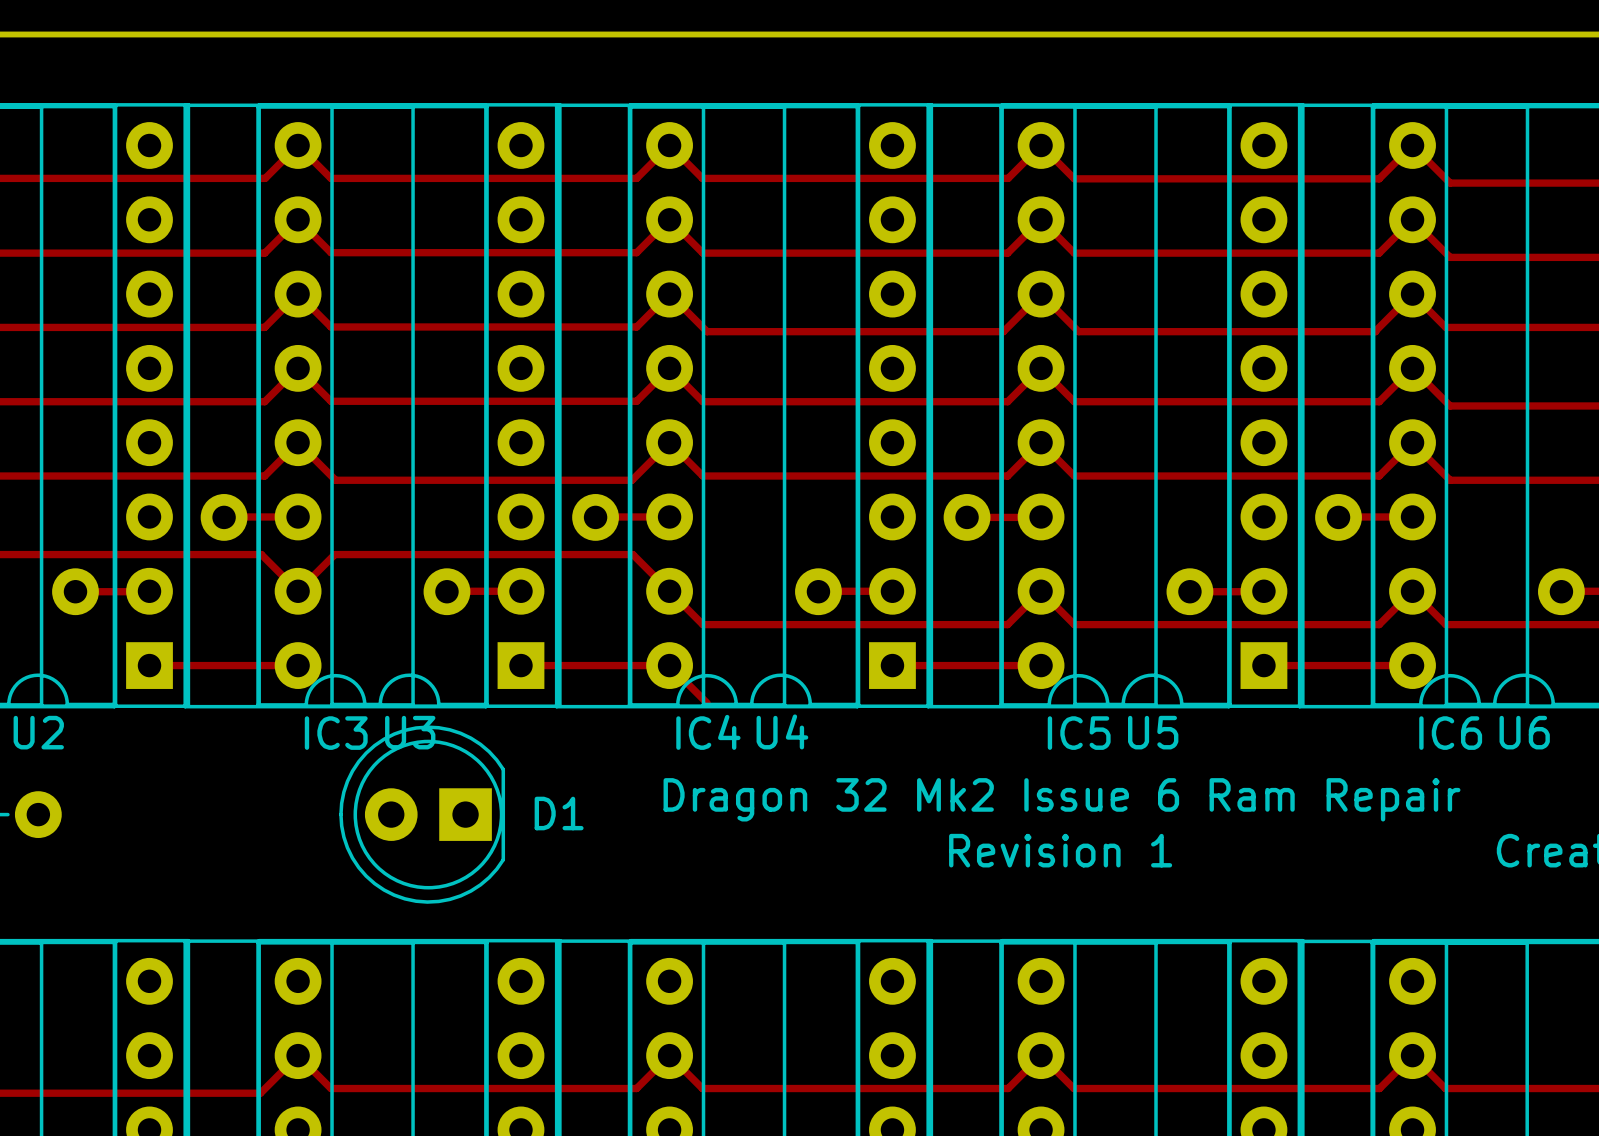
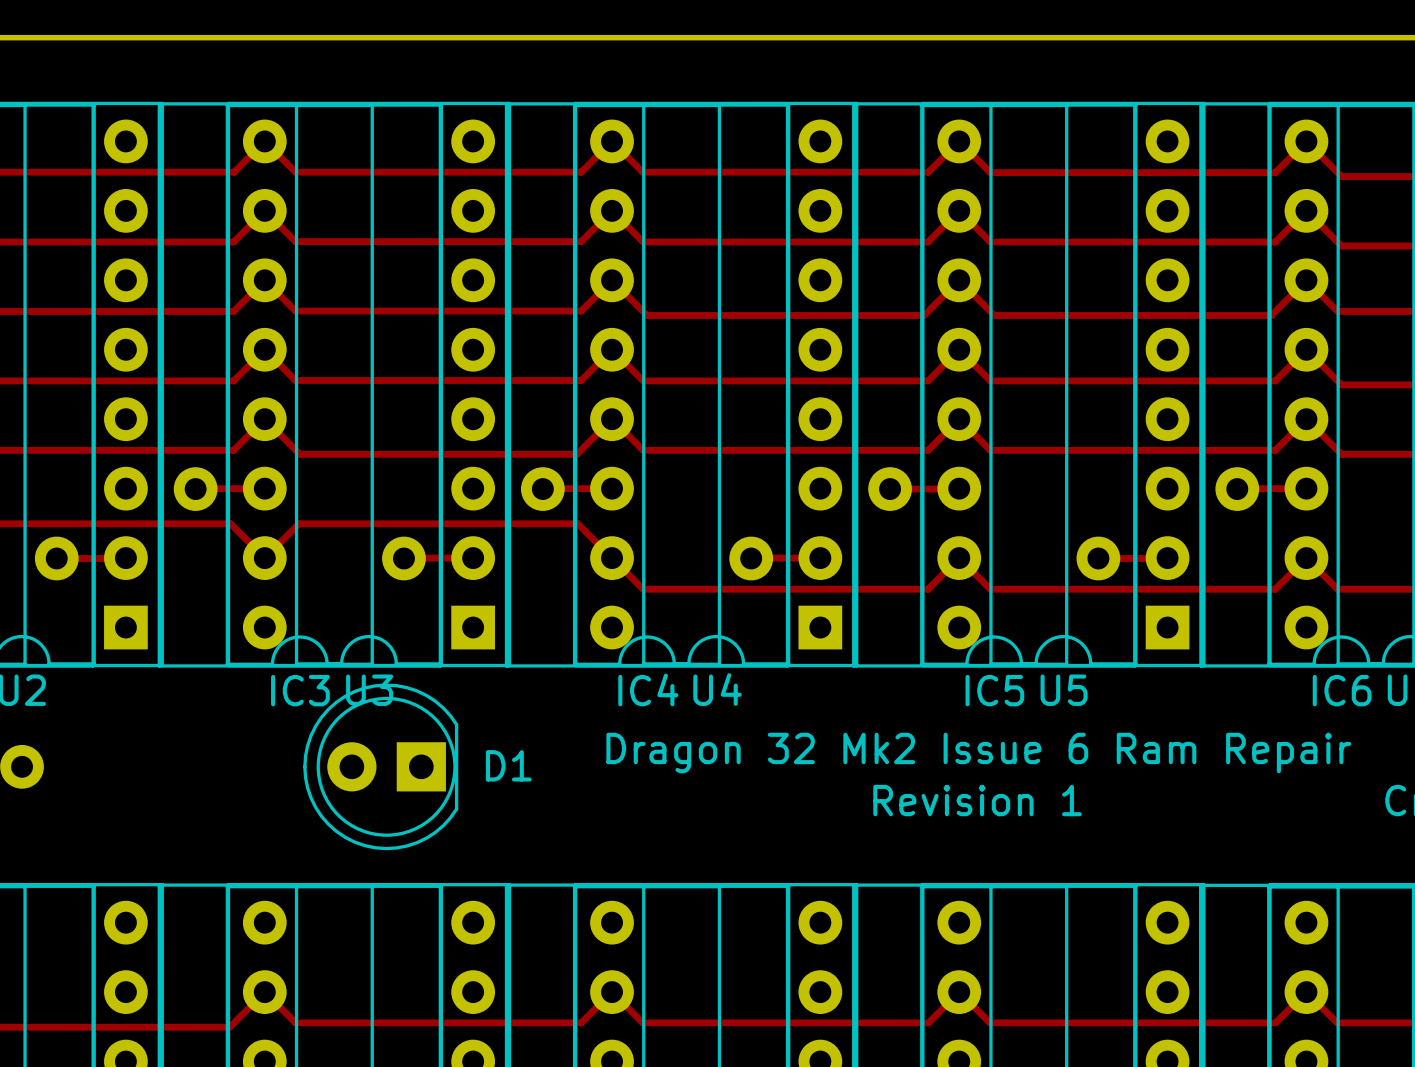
track: (149, 665) (298, 665) -> none
track: (520, 665) (669, 665) (707, 703) -> none
track: (892, 665) (1041, 665) -> none
track: (1263, 665) (1412, 665) -> none

